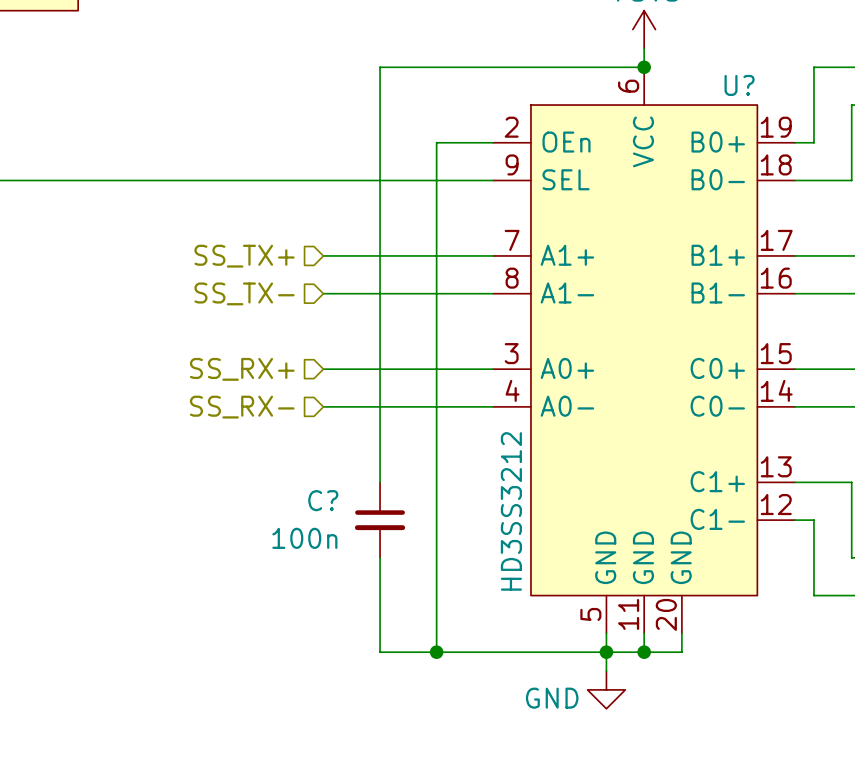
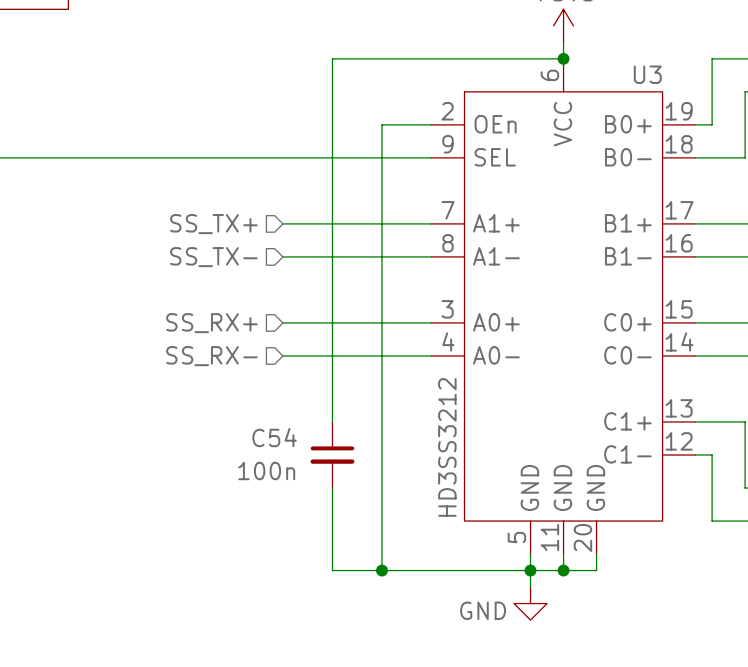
U? name: U? (739, 85) -> U3 (647, 74)
C? name: C? (323, 500) -> C54 (274, 437)

